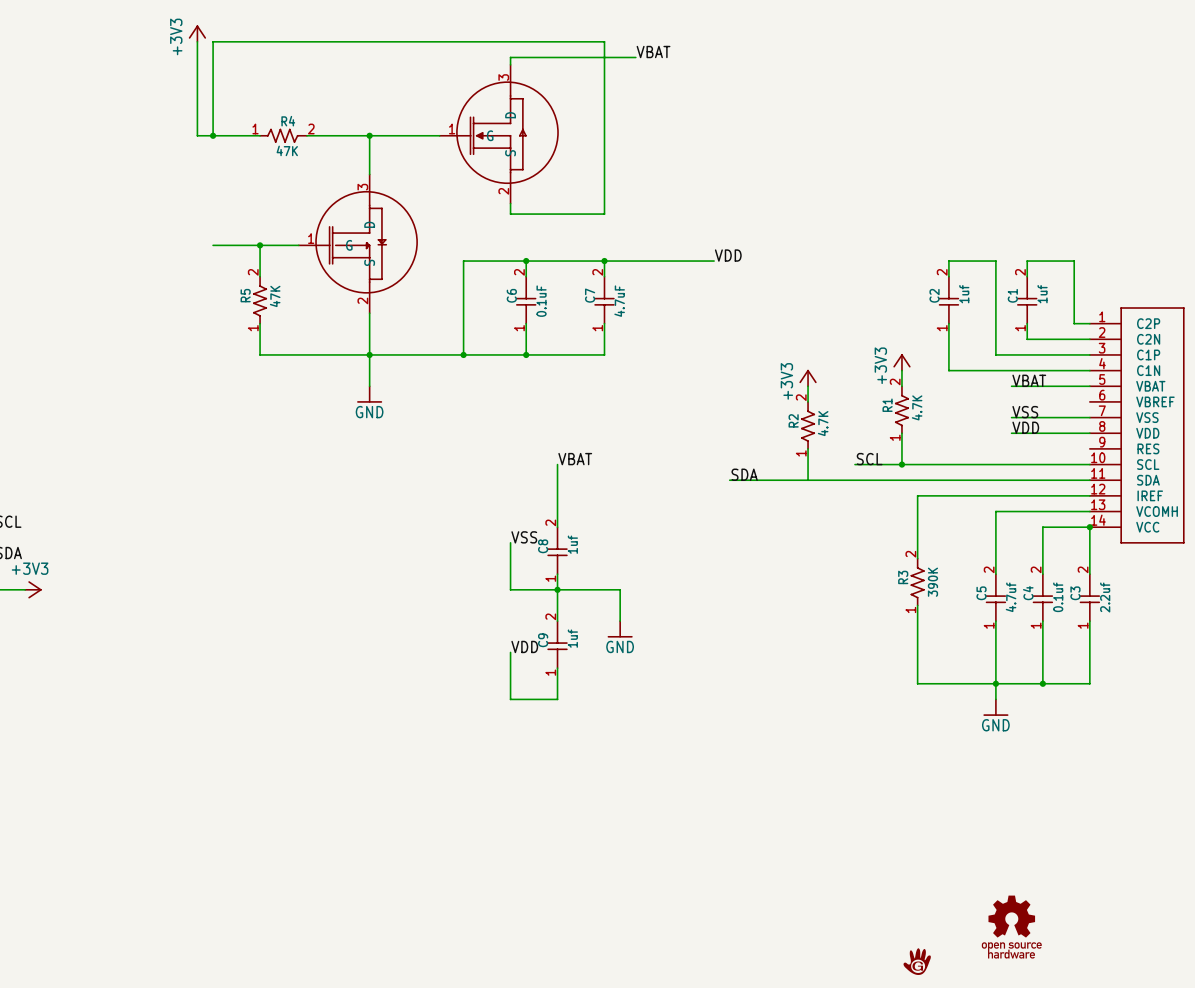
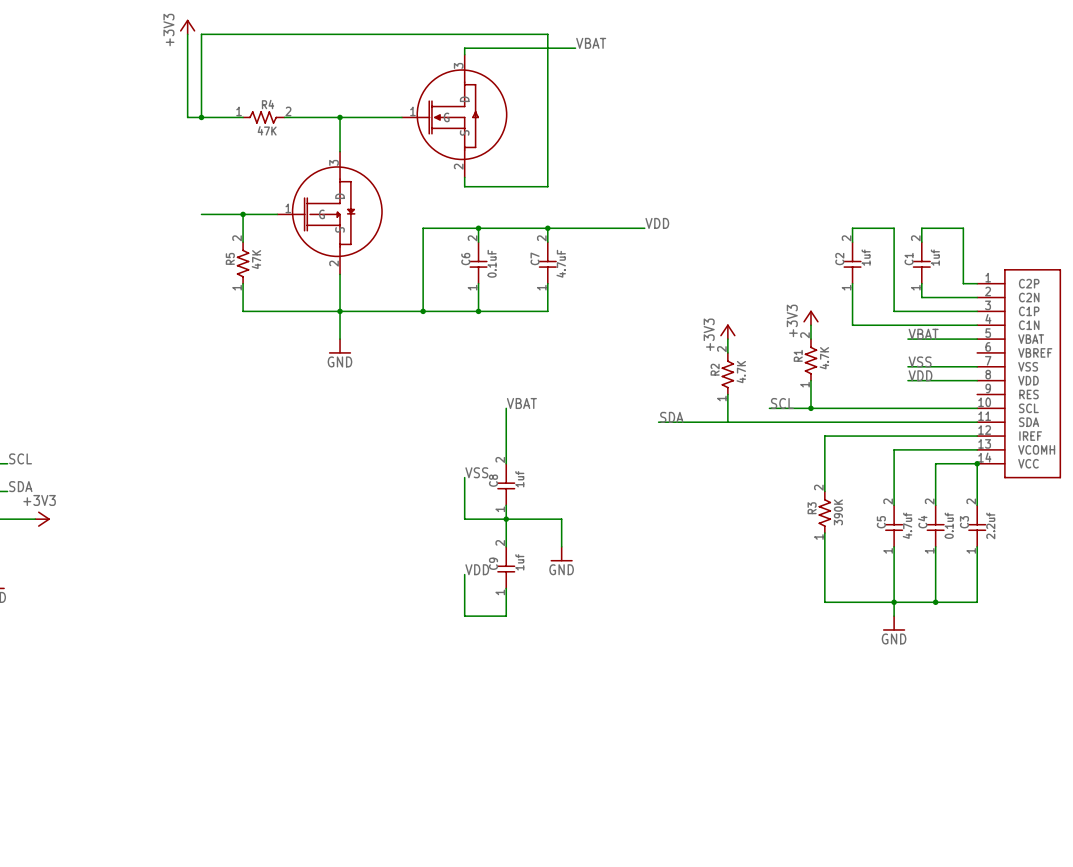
part: (1011, 927) -> none
part: (917, 961) -> none

